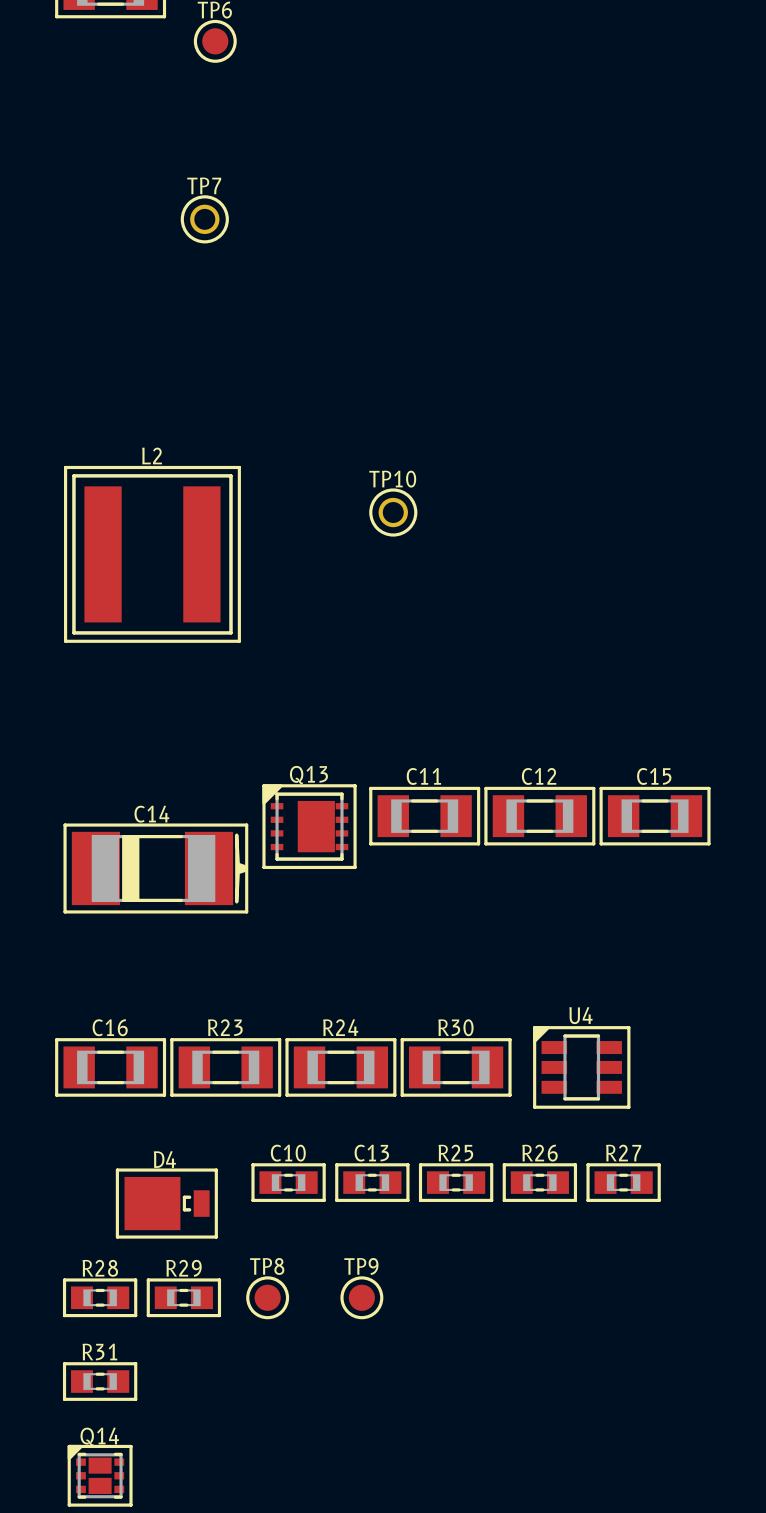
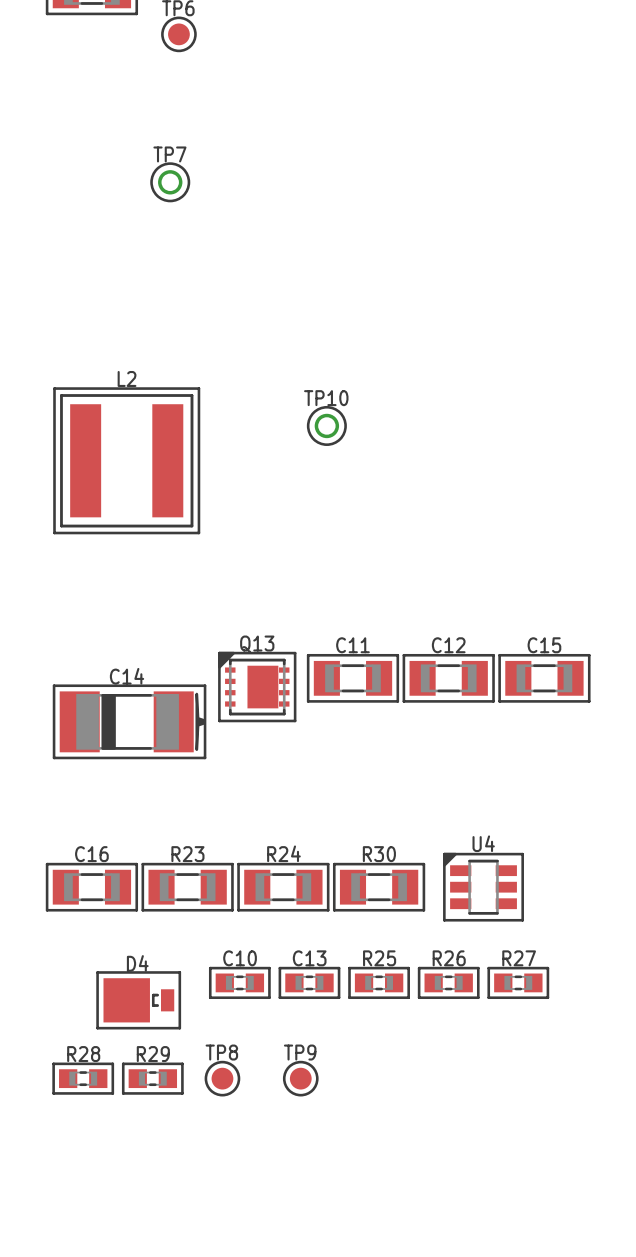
R31: (100, 1381) -> none
Q14: (100, 1475) -> none

